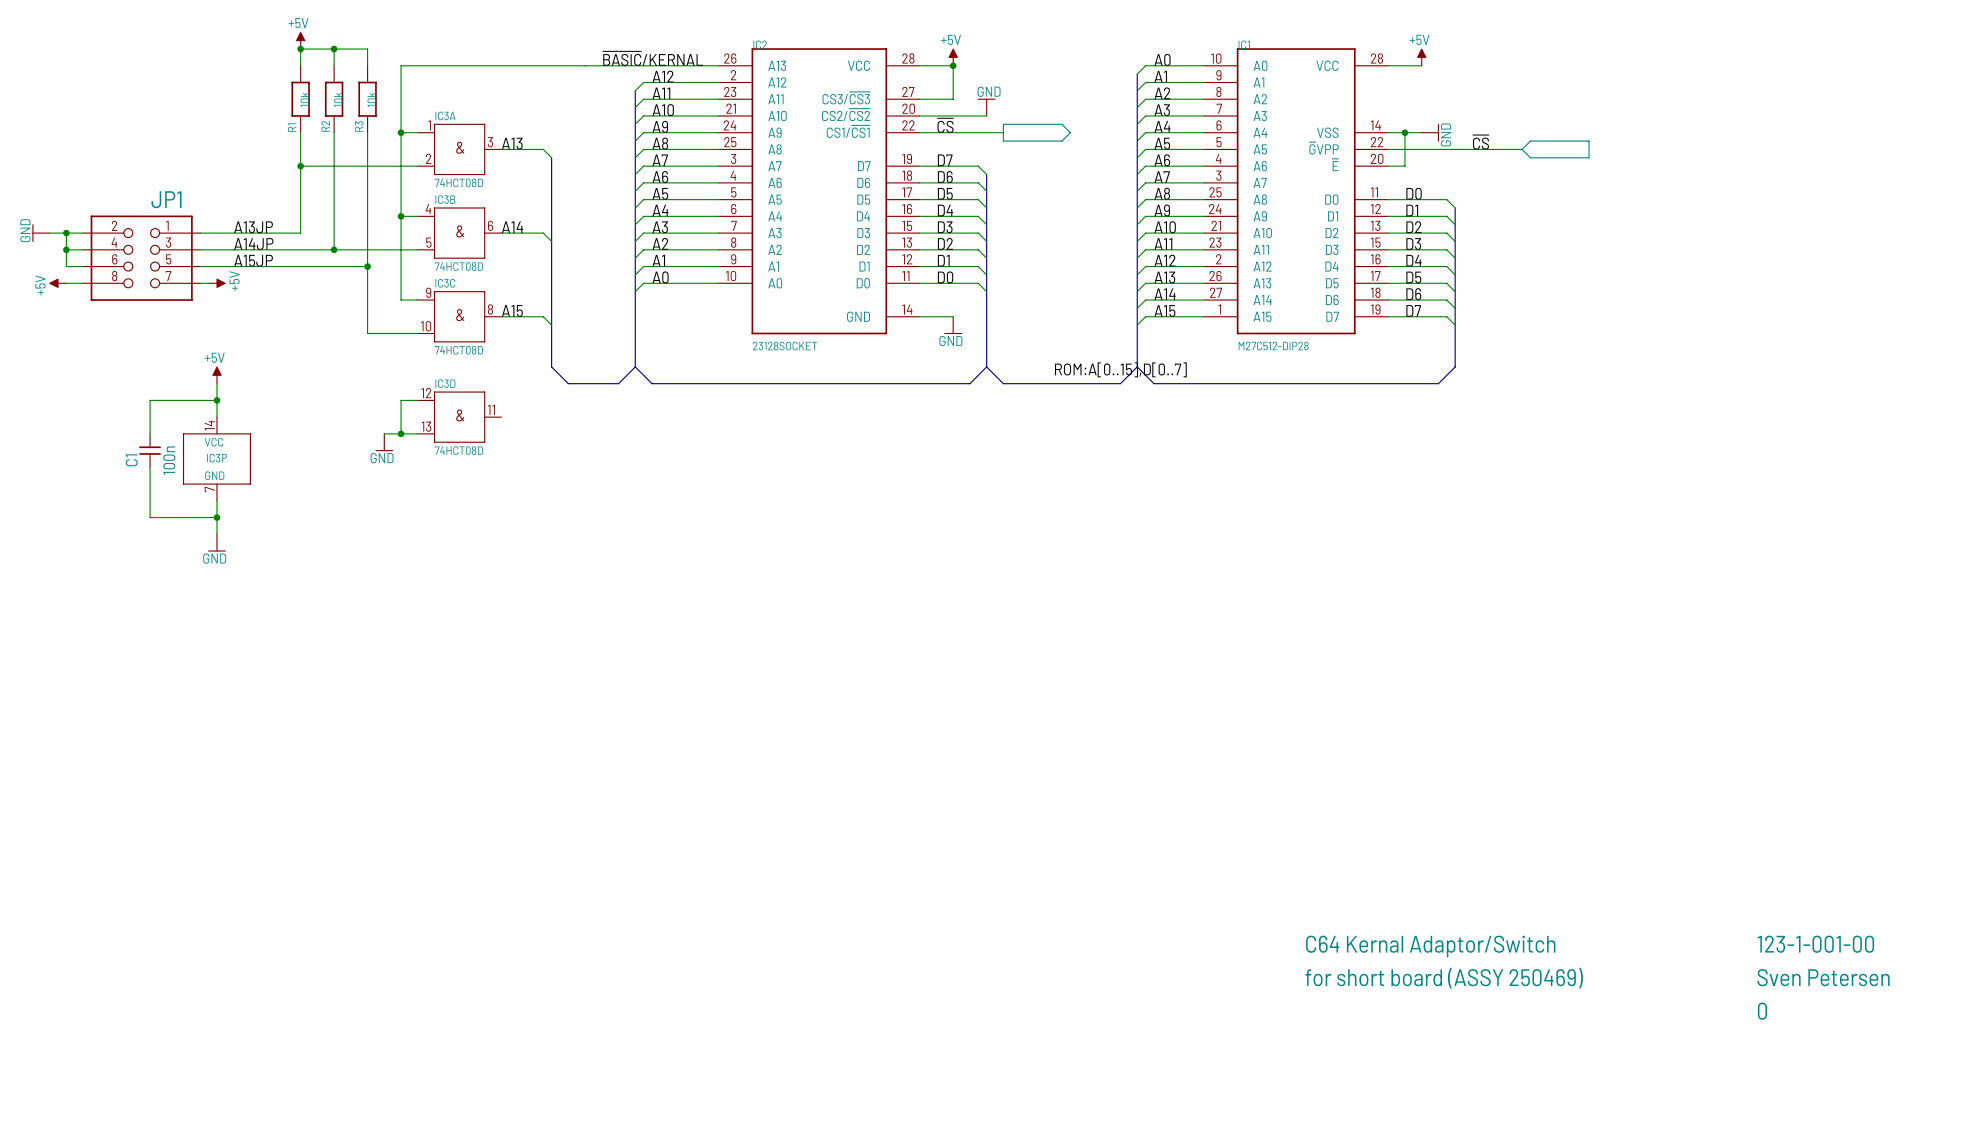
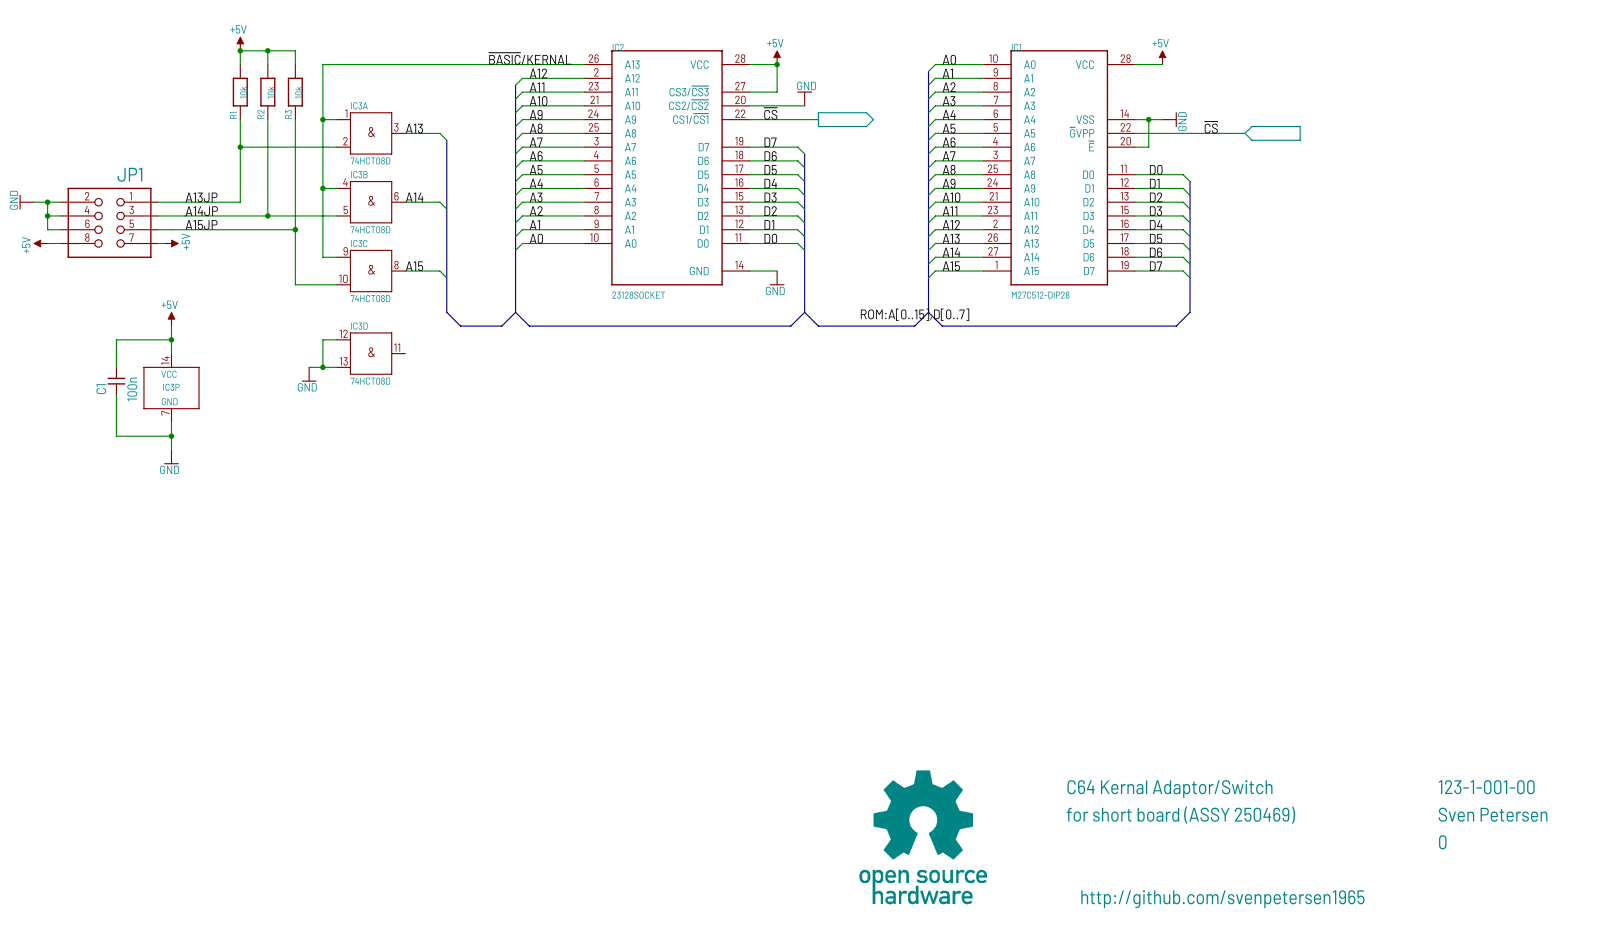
part: none -> (923, 837)
text: none -> http://github.com/svenpetersen1965 (1222, 899)

